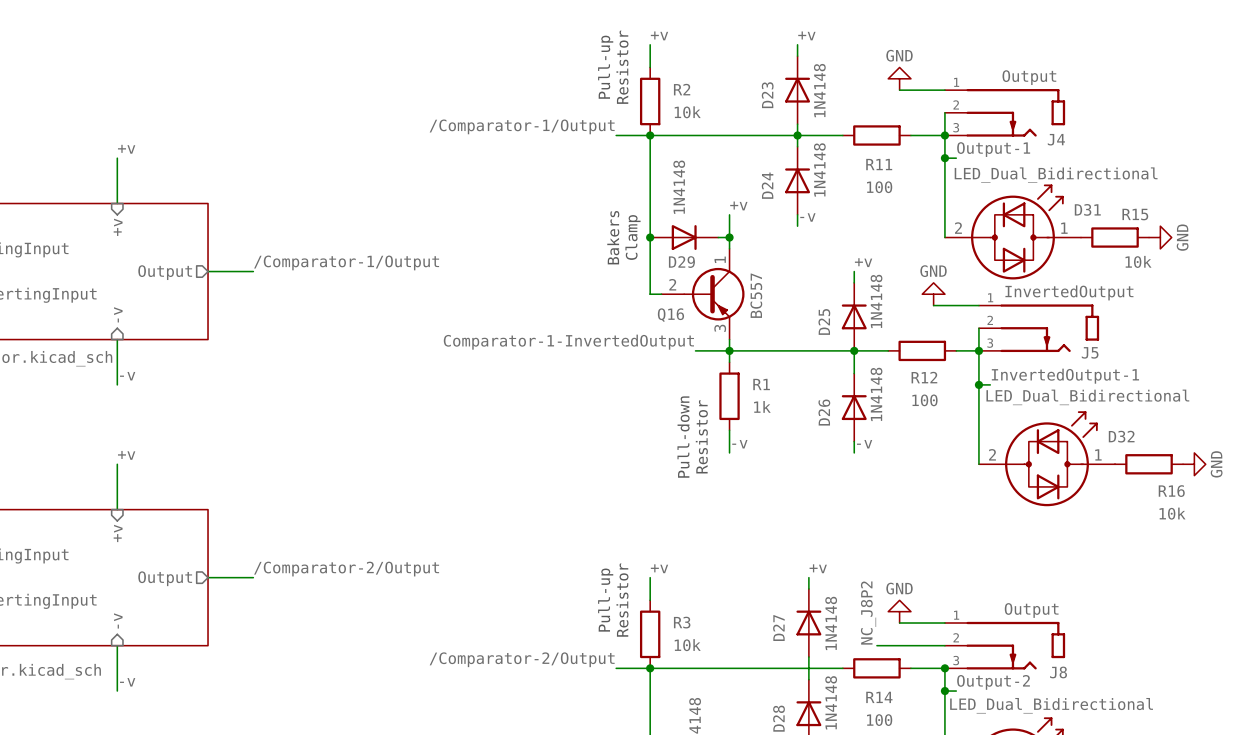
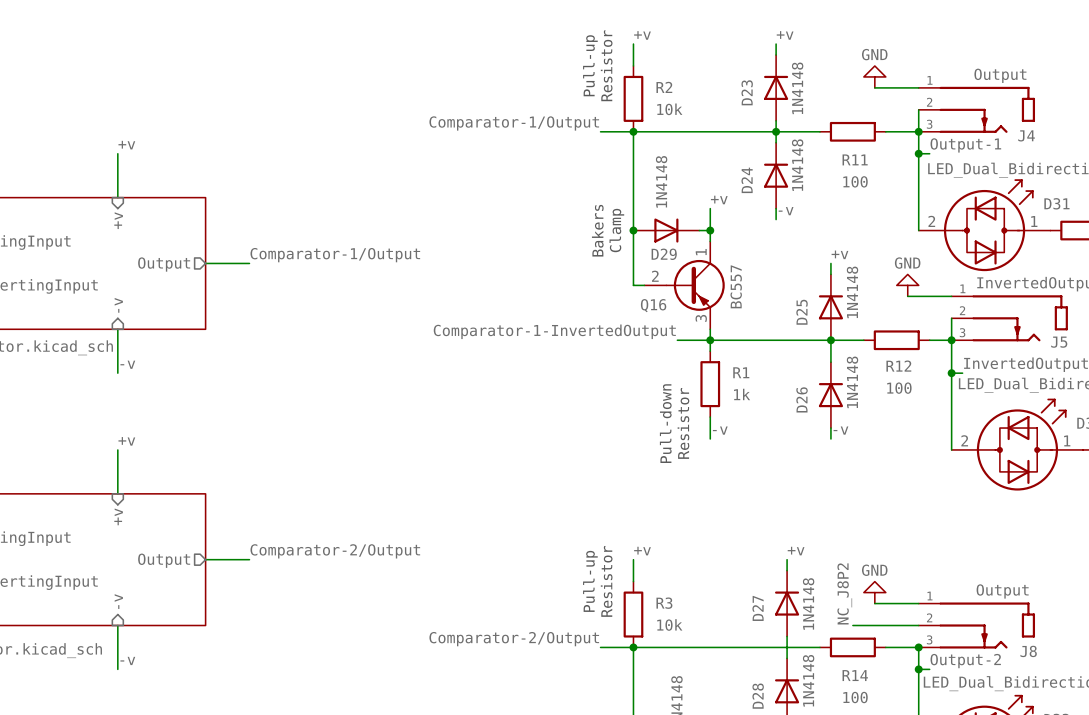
label: /Comparator-1/Output (522, 126) -> Comparator-1/Output (514, 123)
label: /Comparator-1/Output (346, 262) -> Comparator-1/Output (335, 255)
label: /Comparator-2/Output (346, 569) -> Comparator-2/Output (335, 551)
label: /Comparator-2/Output (522, 659) -> Comparator-2/Output (514, 639)

